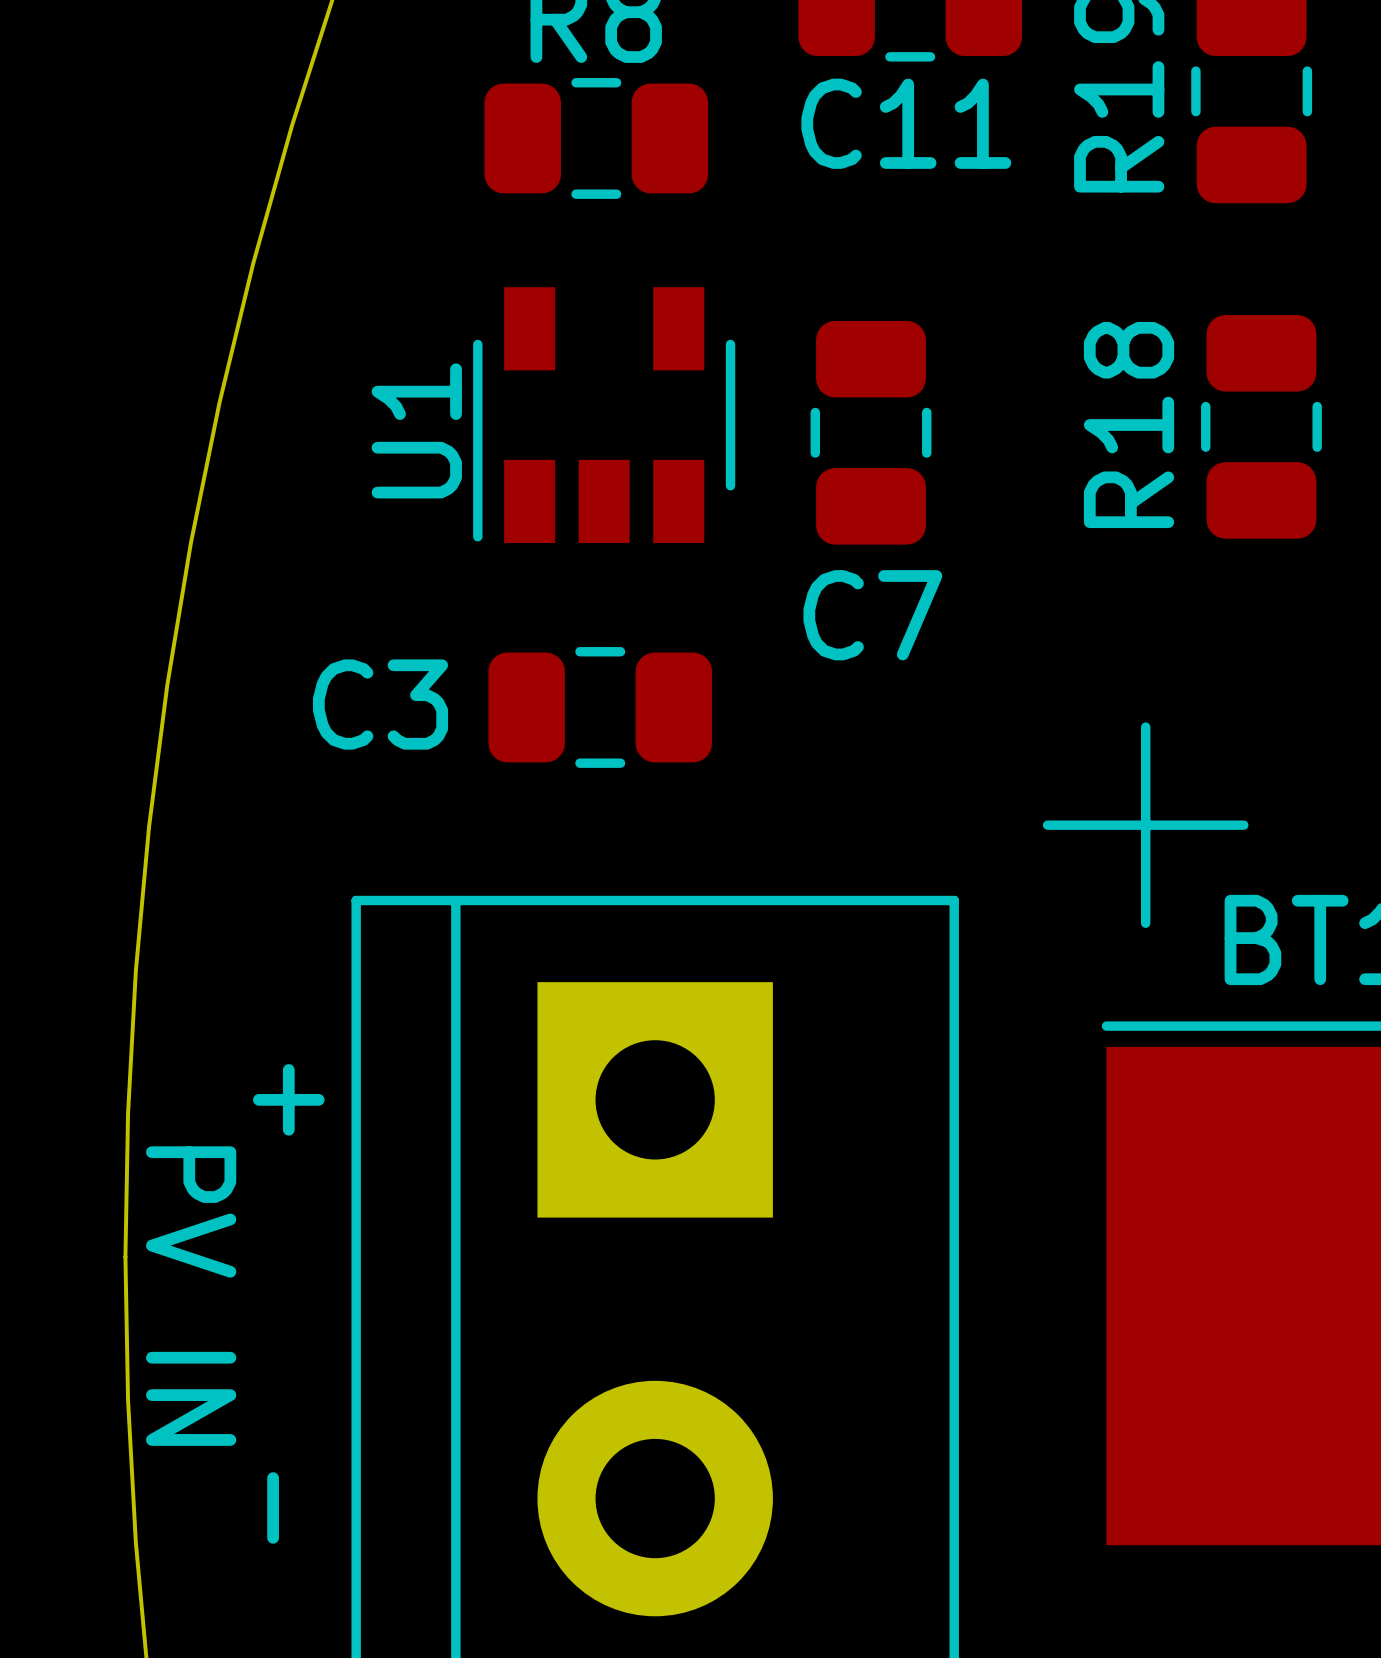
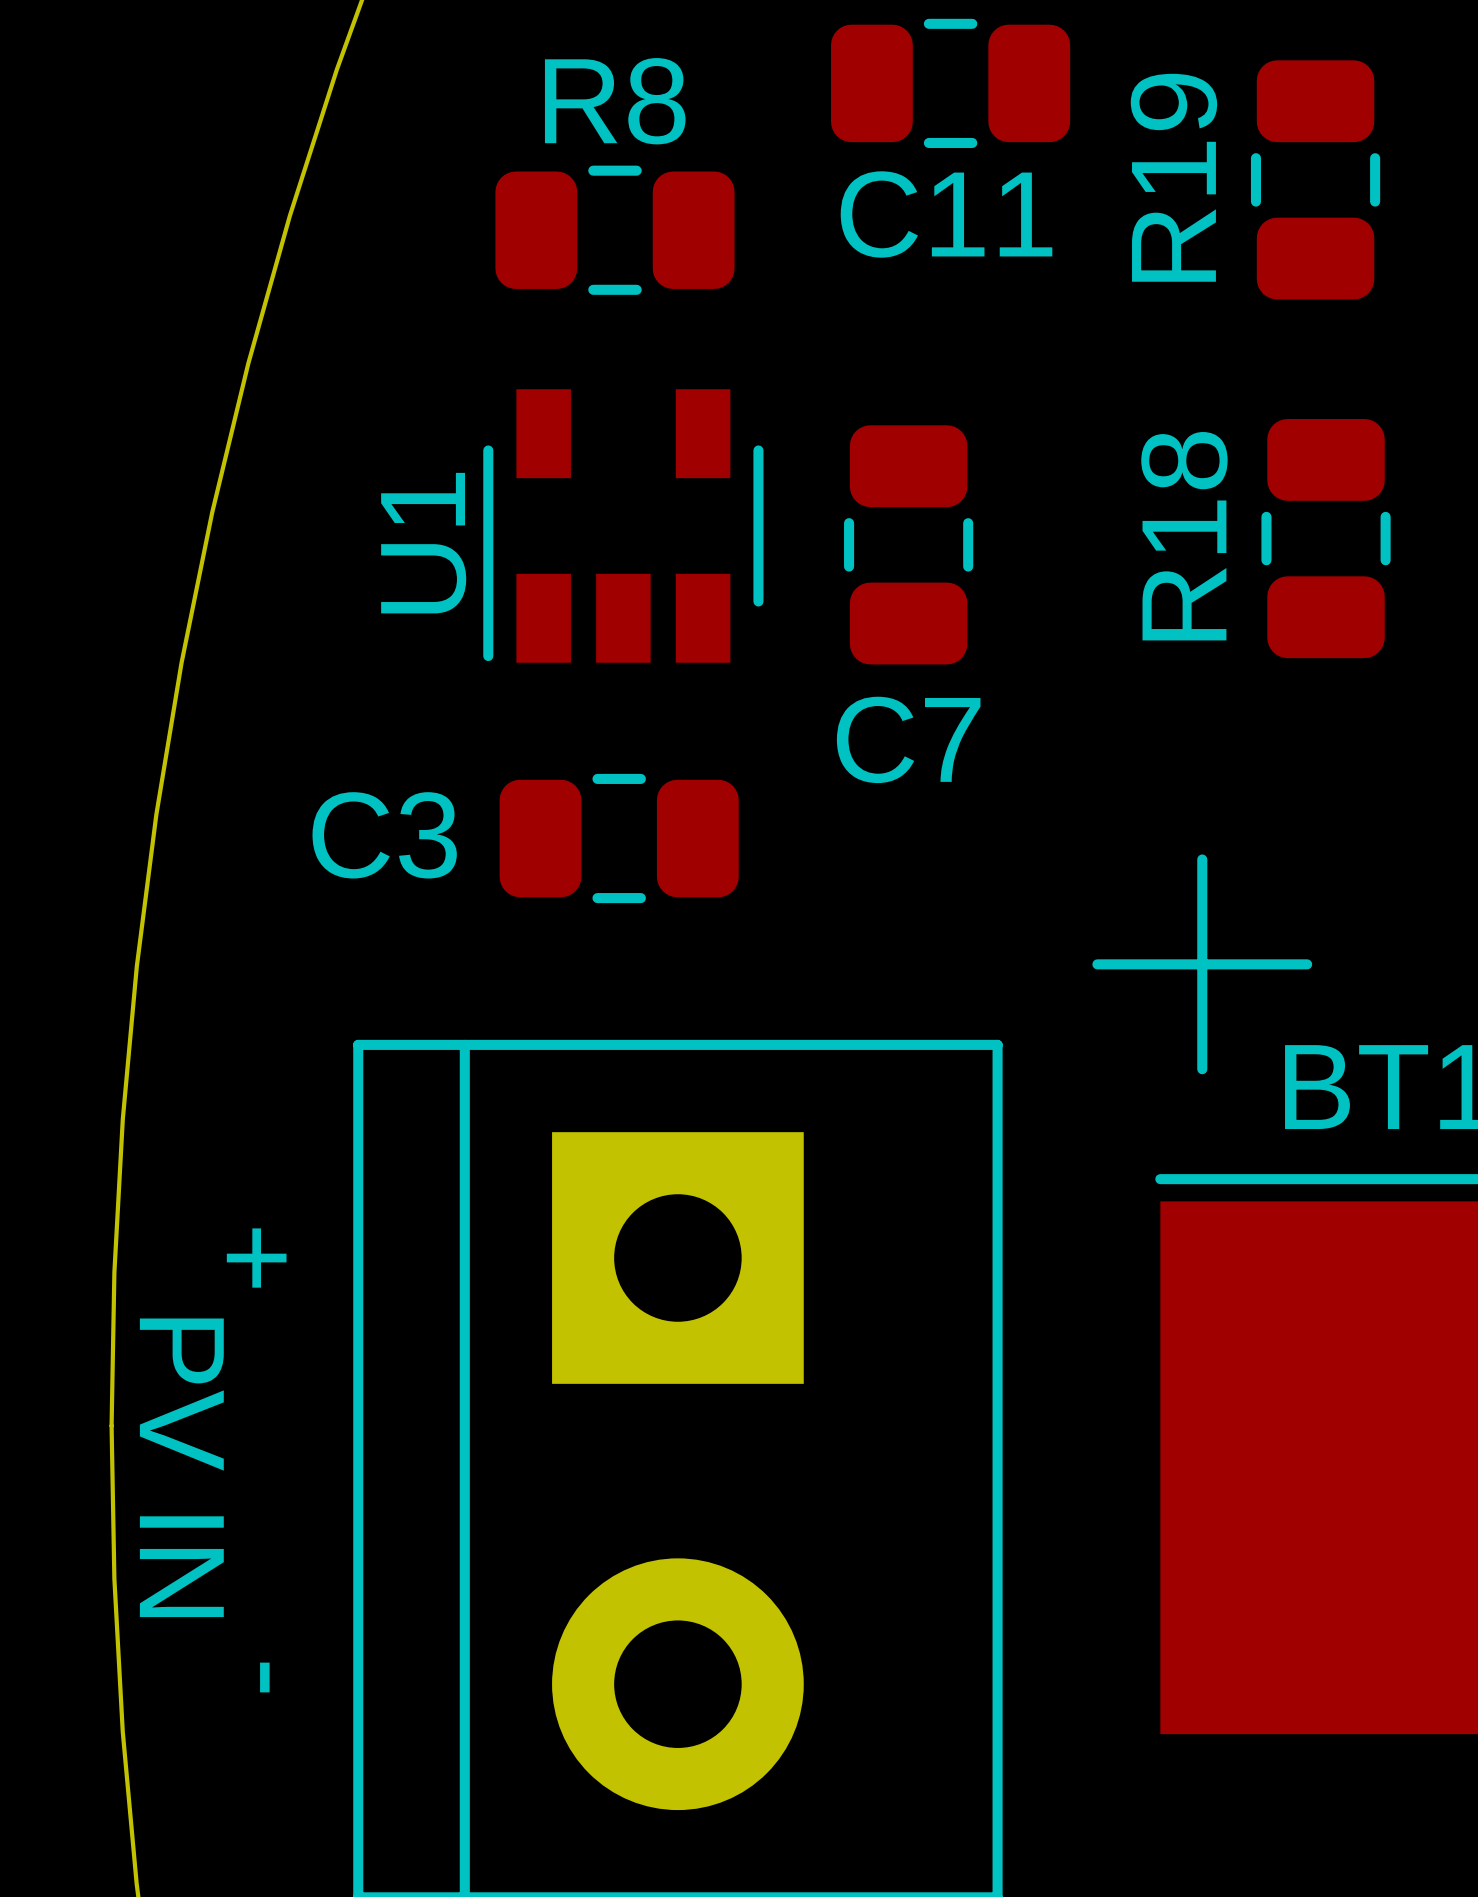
text position: + (288, 1099) -> + (256, 1258)
text position: - (273, 1507) -> - (264, 1677)

